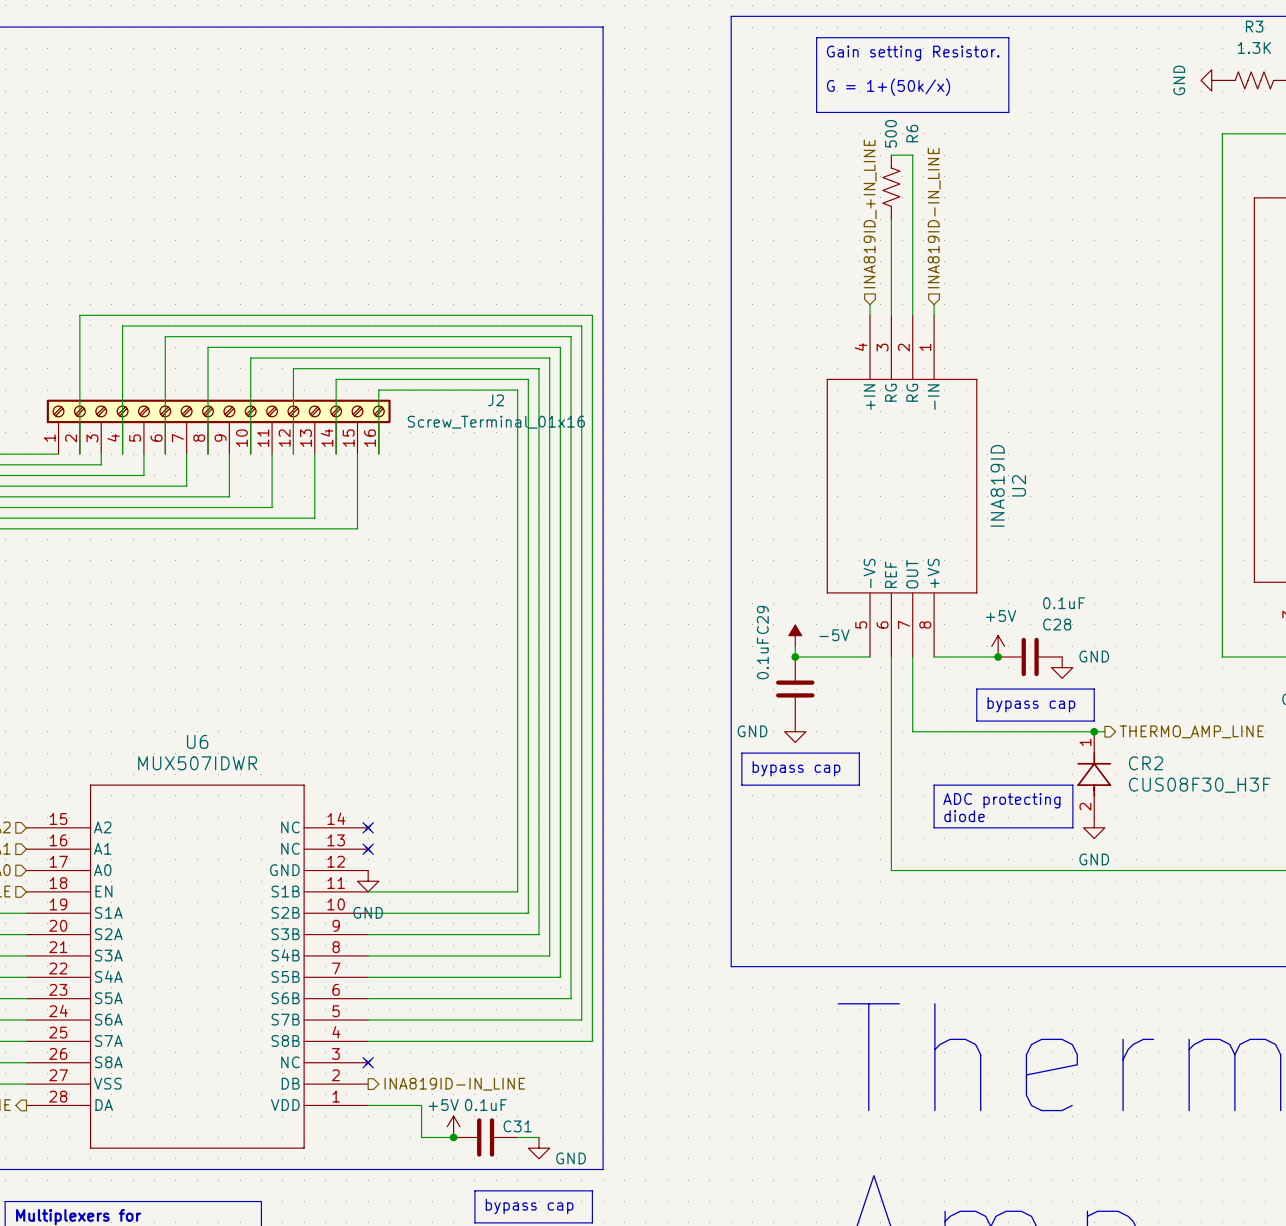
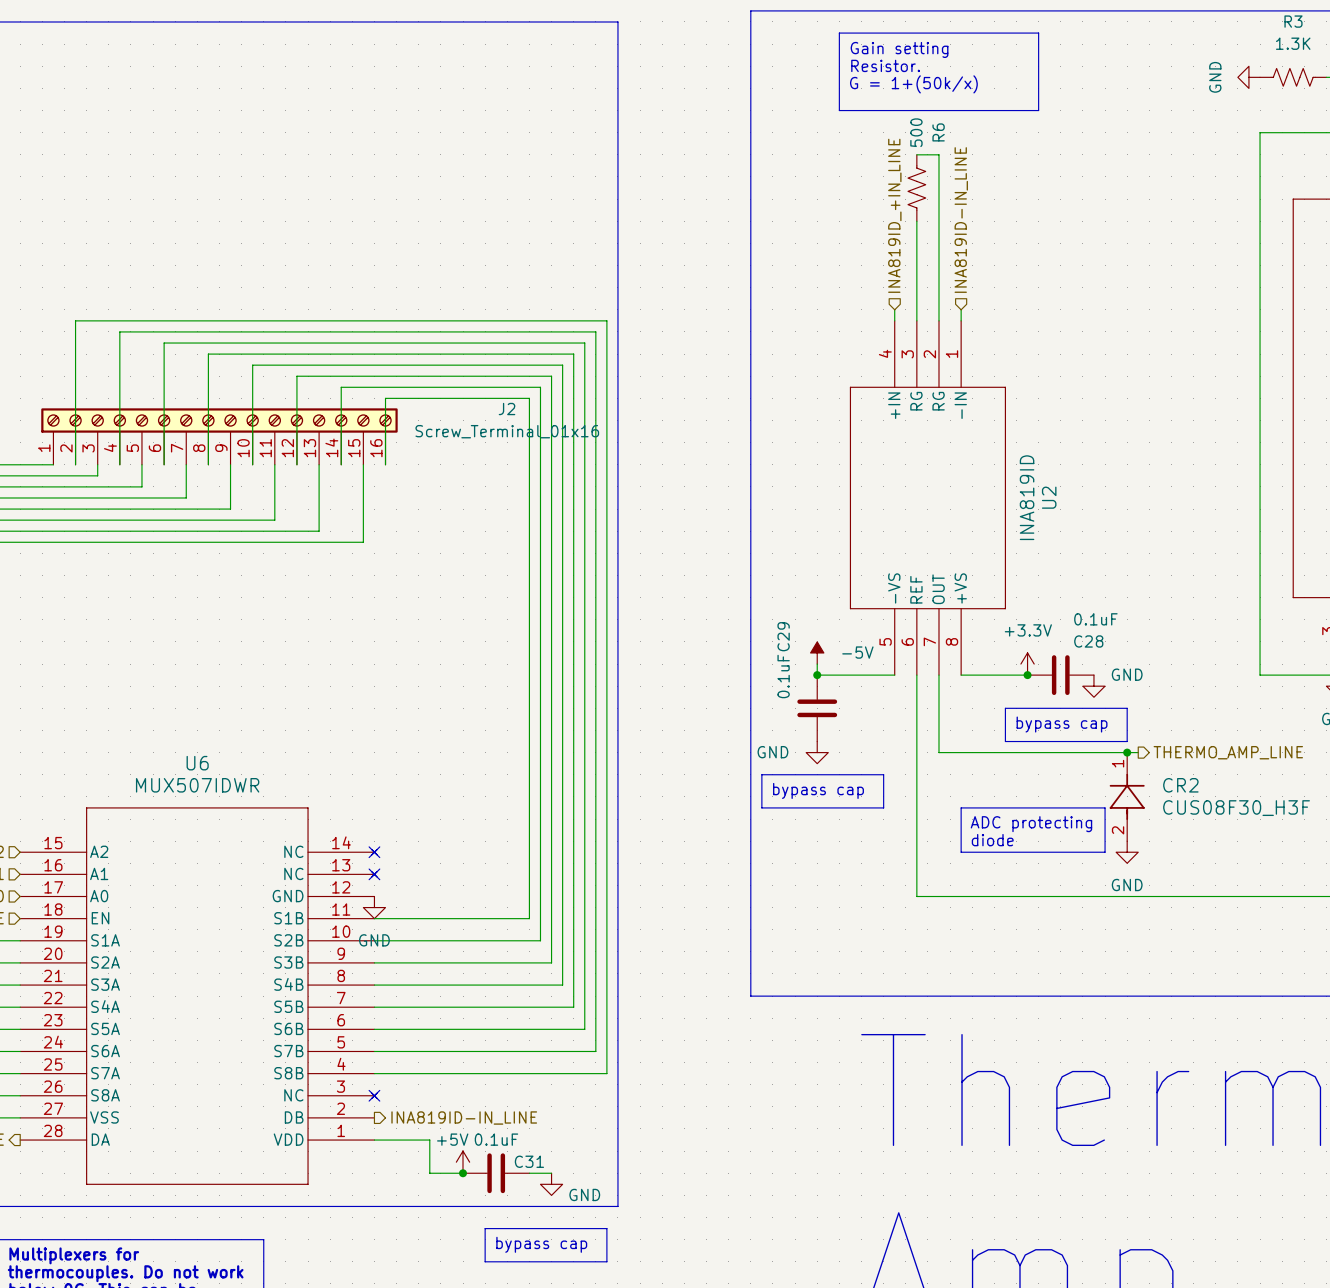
text: Gain setting Resistor. (913, 53) -> Gain setting (899, 49)
text: none -> Resistor. (885, 65)
power symbol: +5V (998, 646) -> +3.3V (1027, 664)

